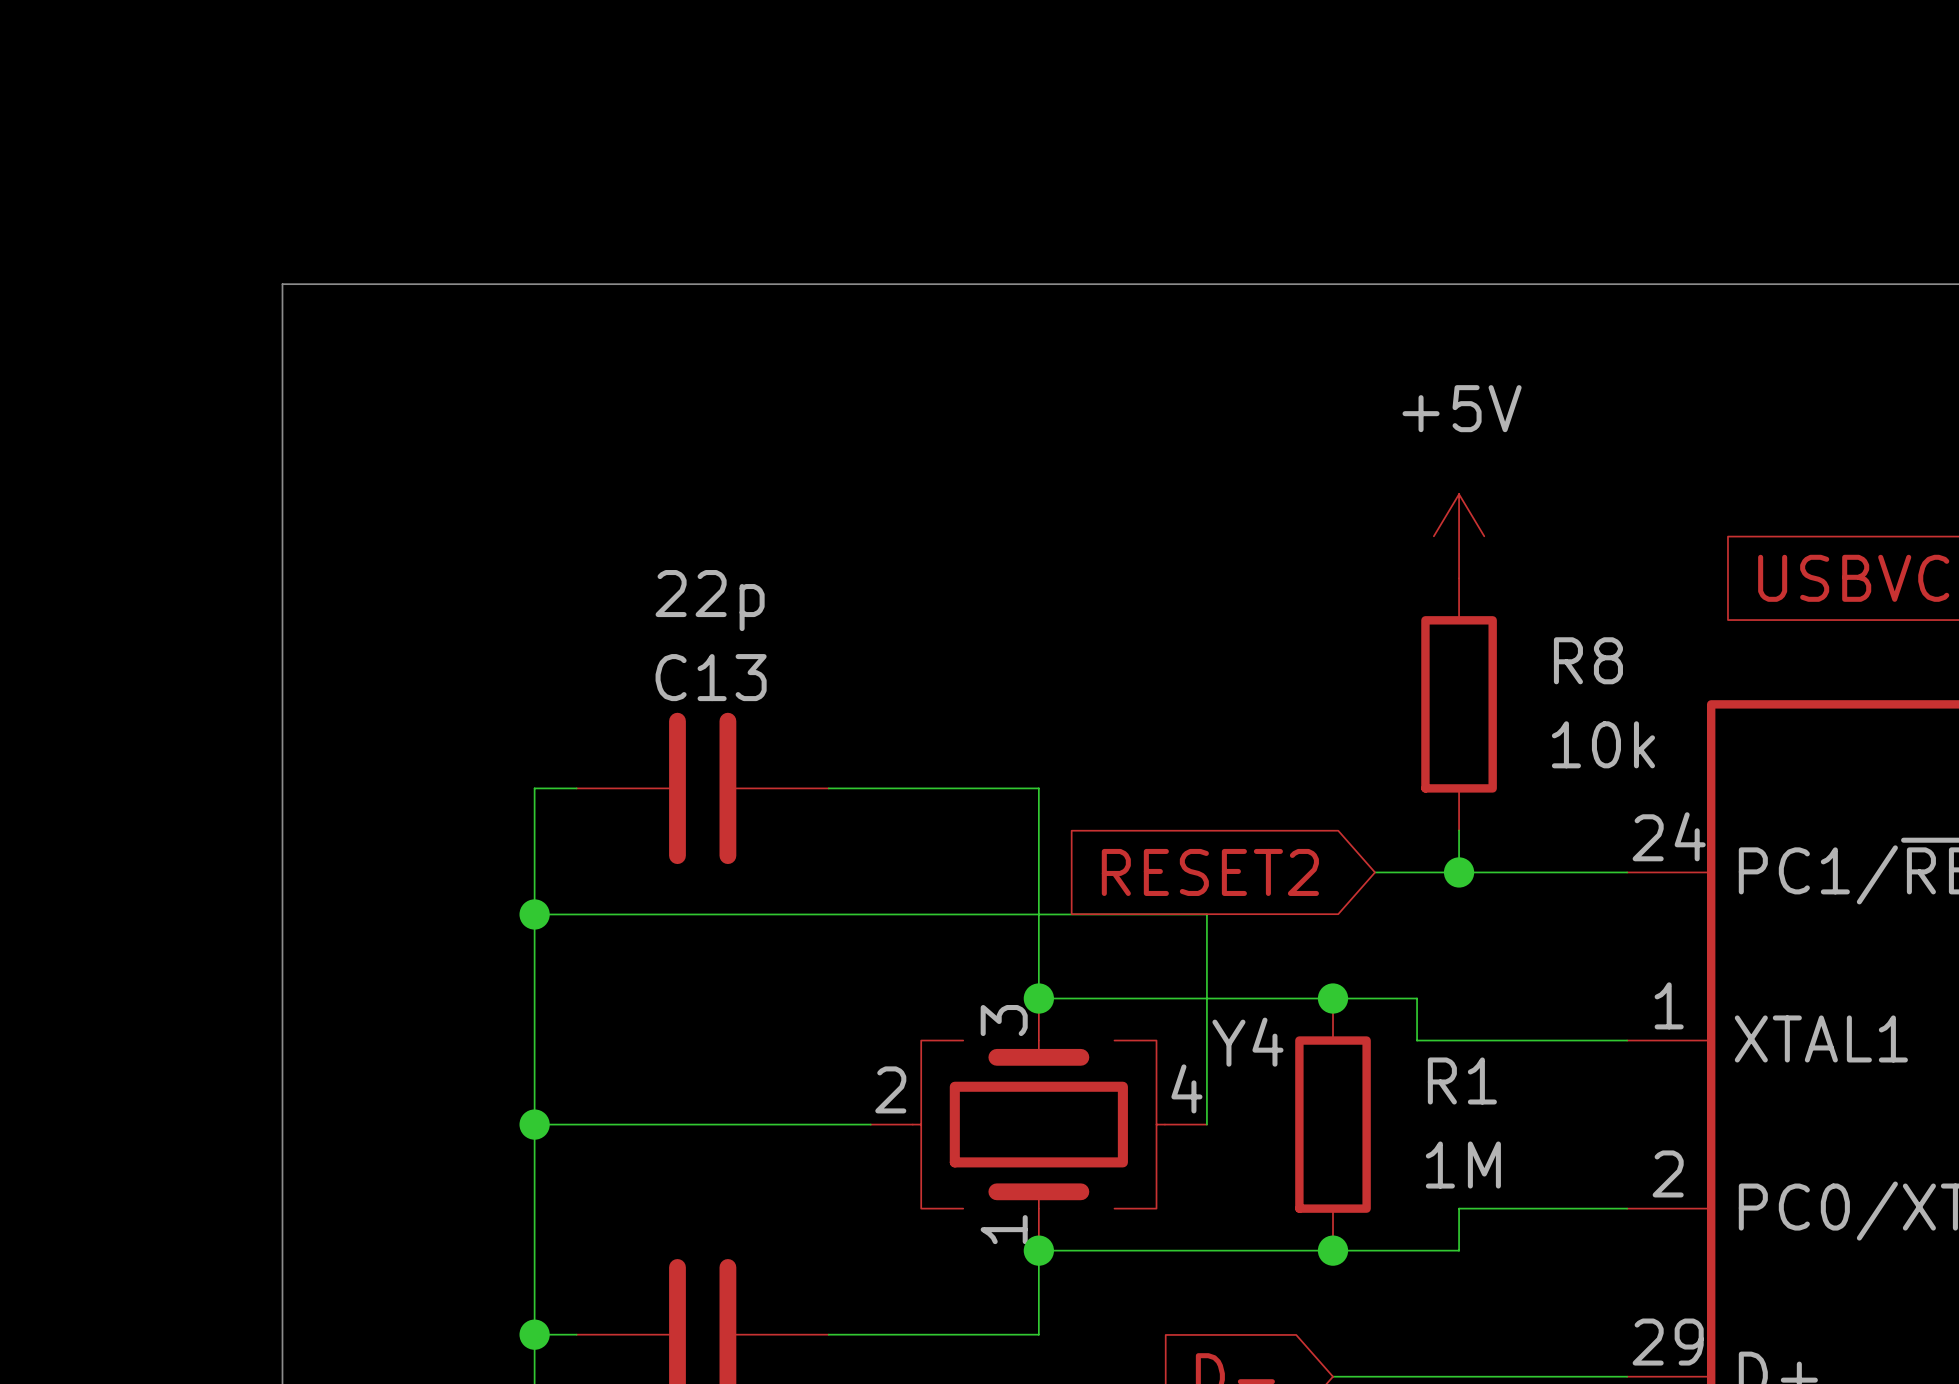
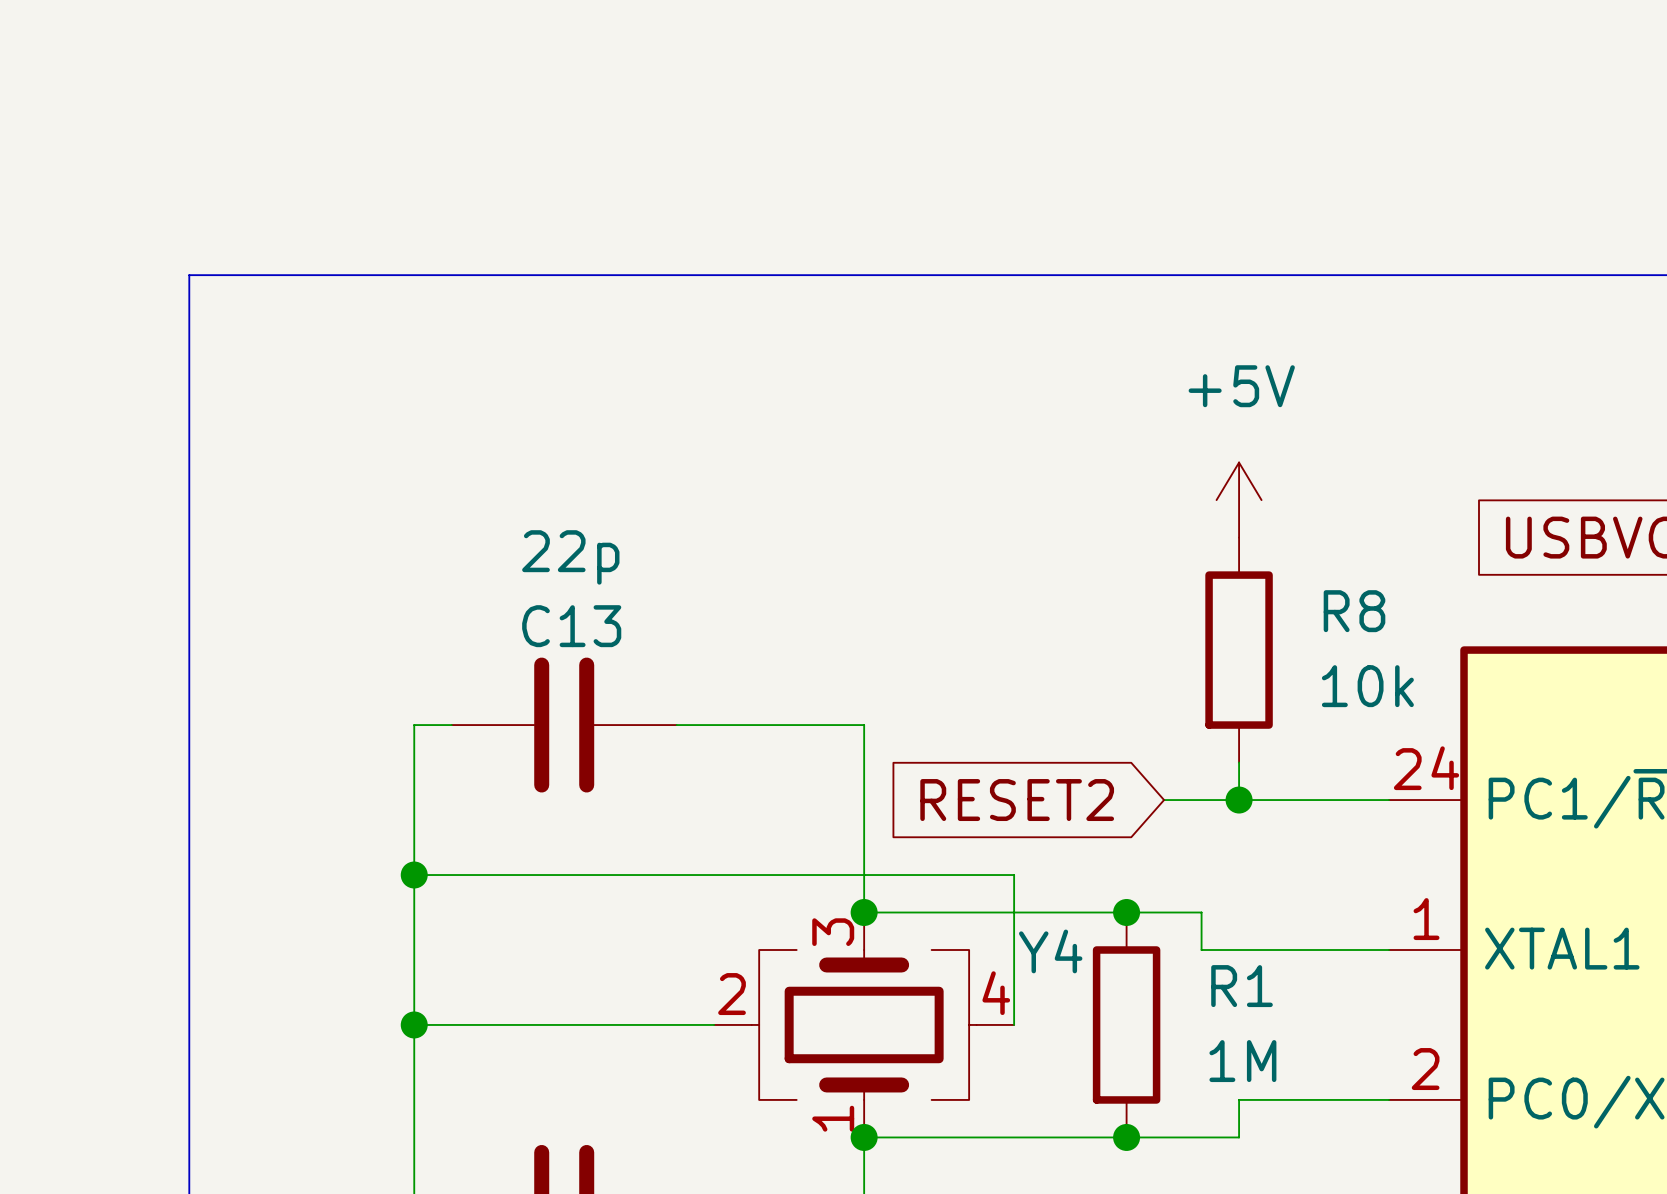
wire: (534, 914) (1206, 914) (1206, 956) -> (414, 875) (1014, 875)
junction position: (534, 914) -> (414, 875)

